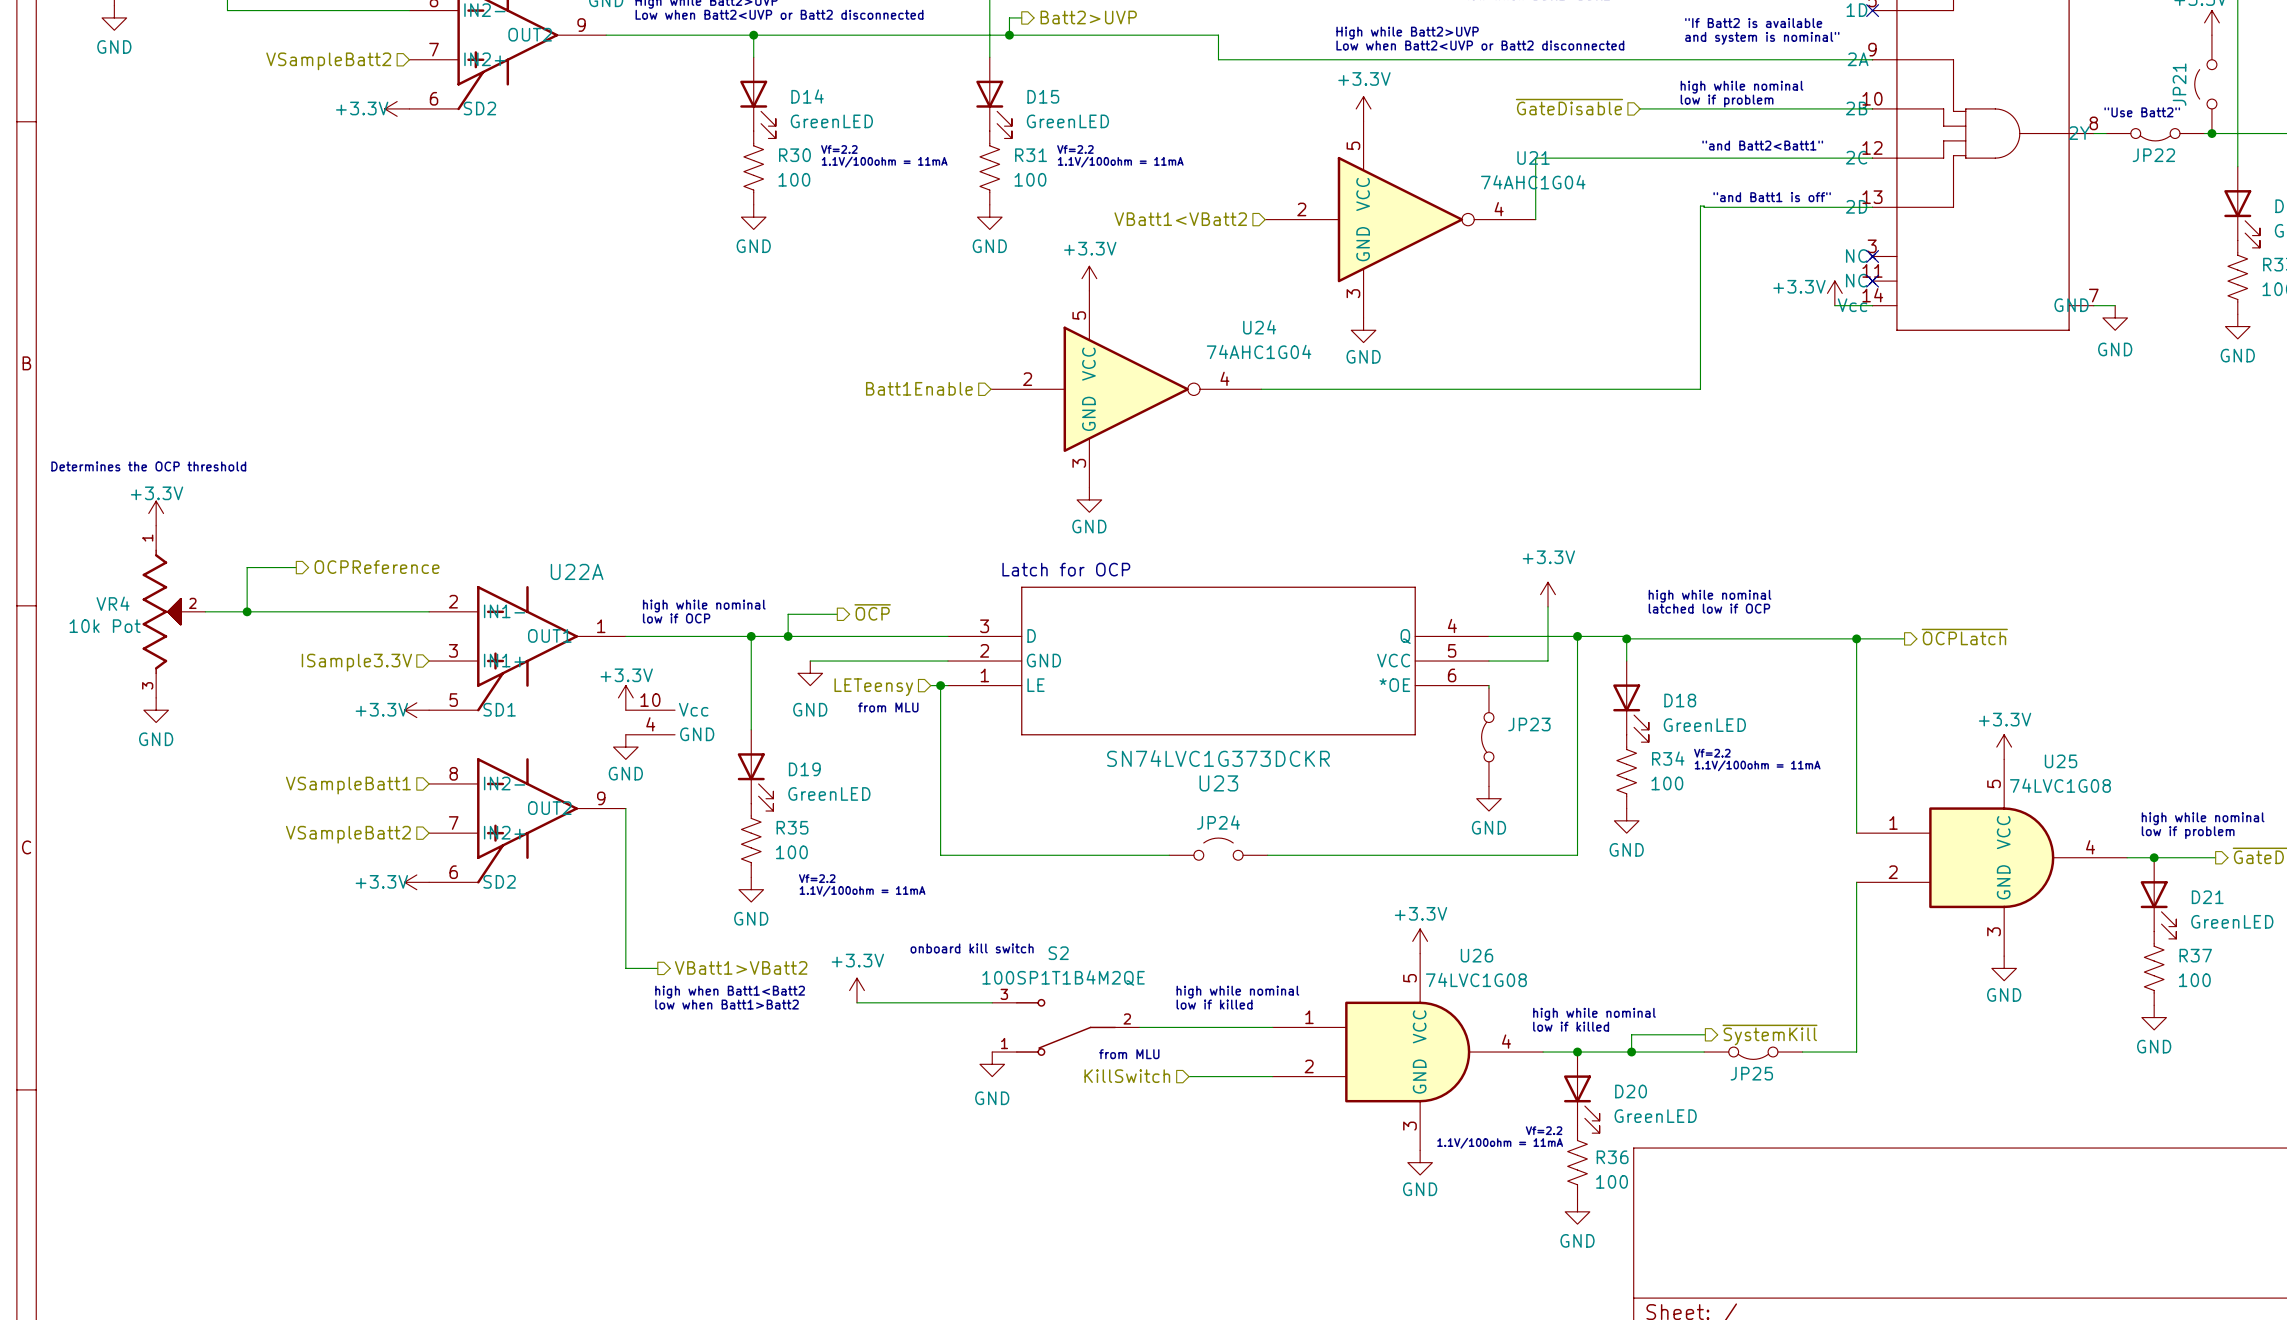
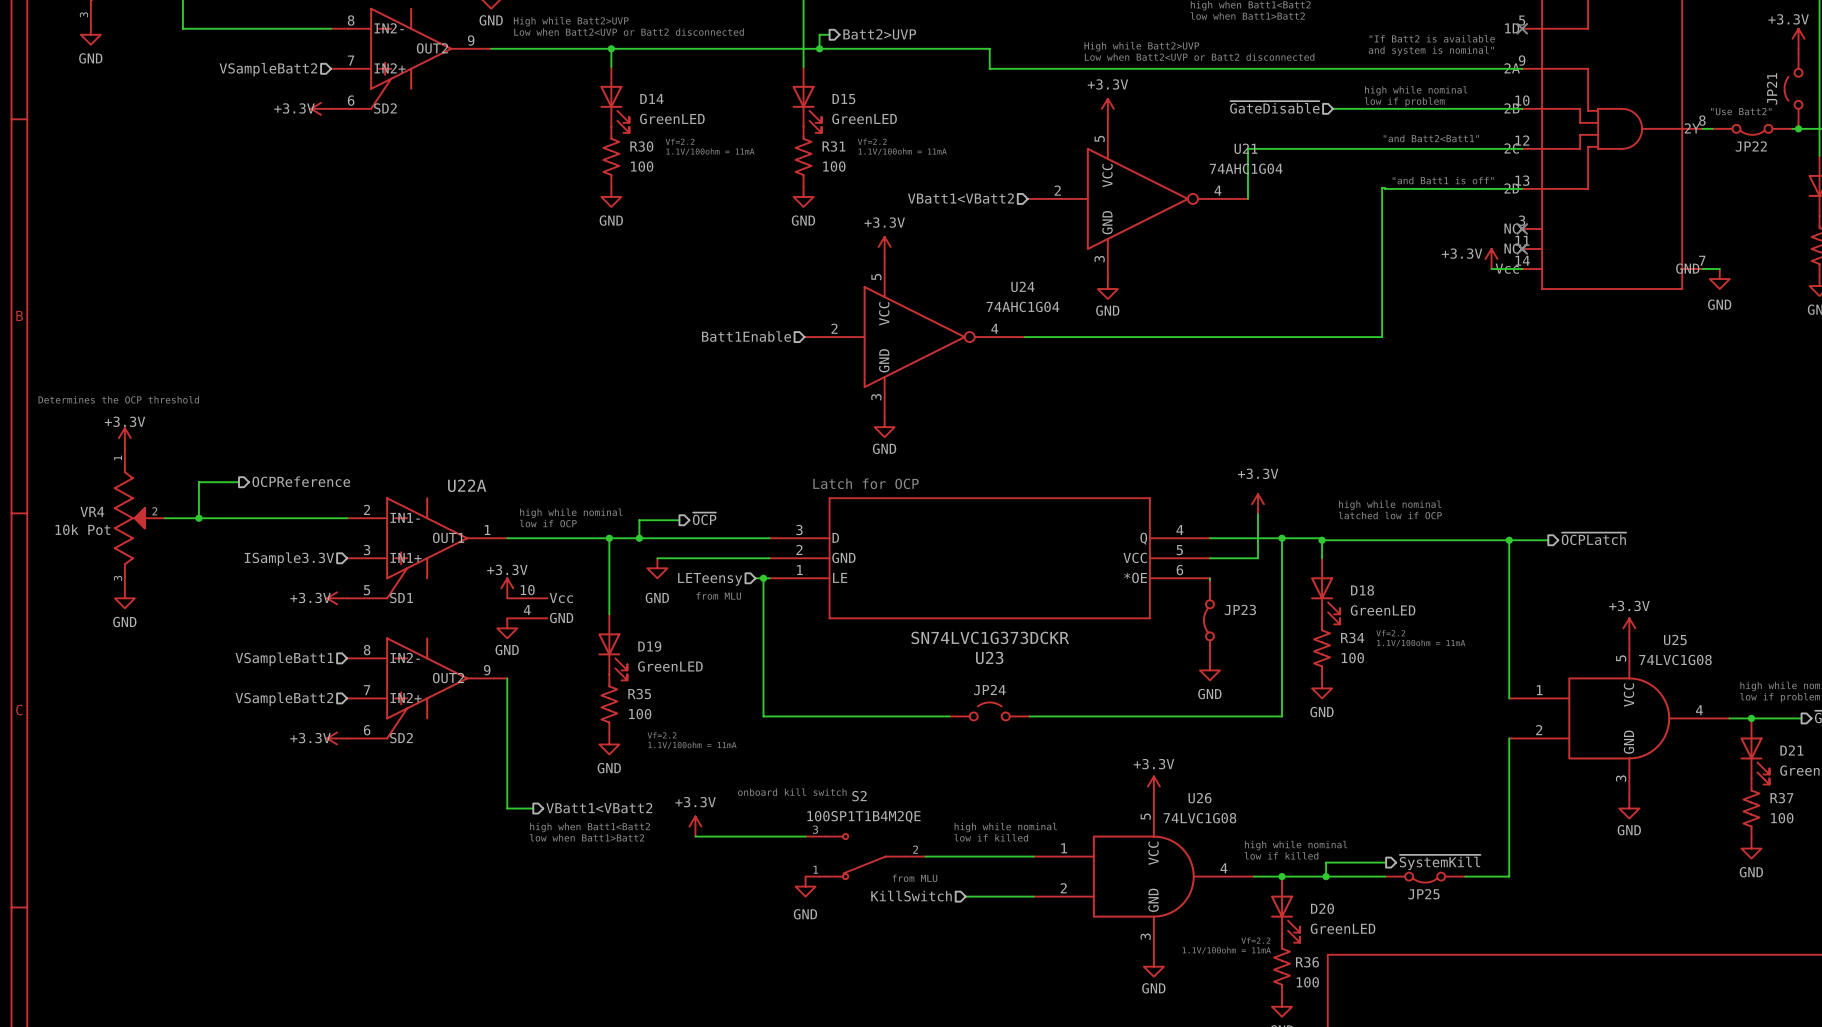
hierarchical label: VBatt1>VBatt2 (741, 967) -> VBatt1<VBatt2 (599, 808)

